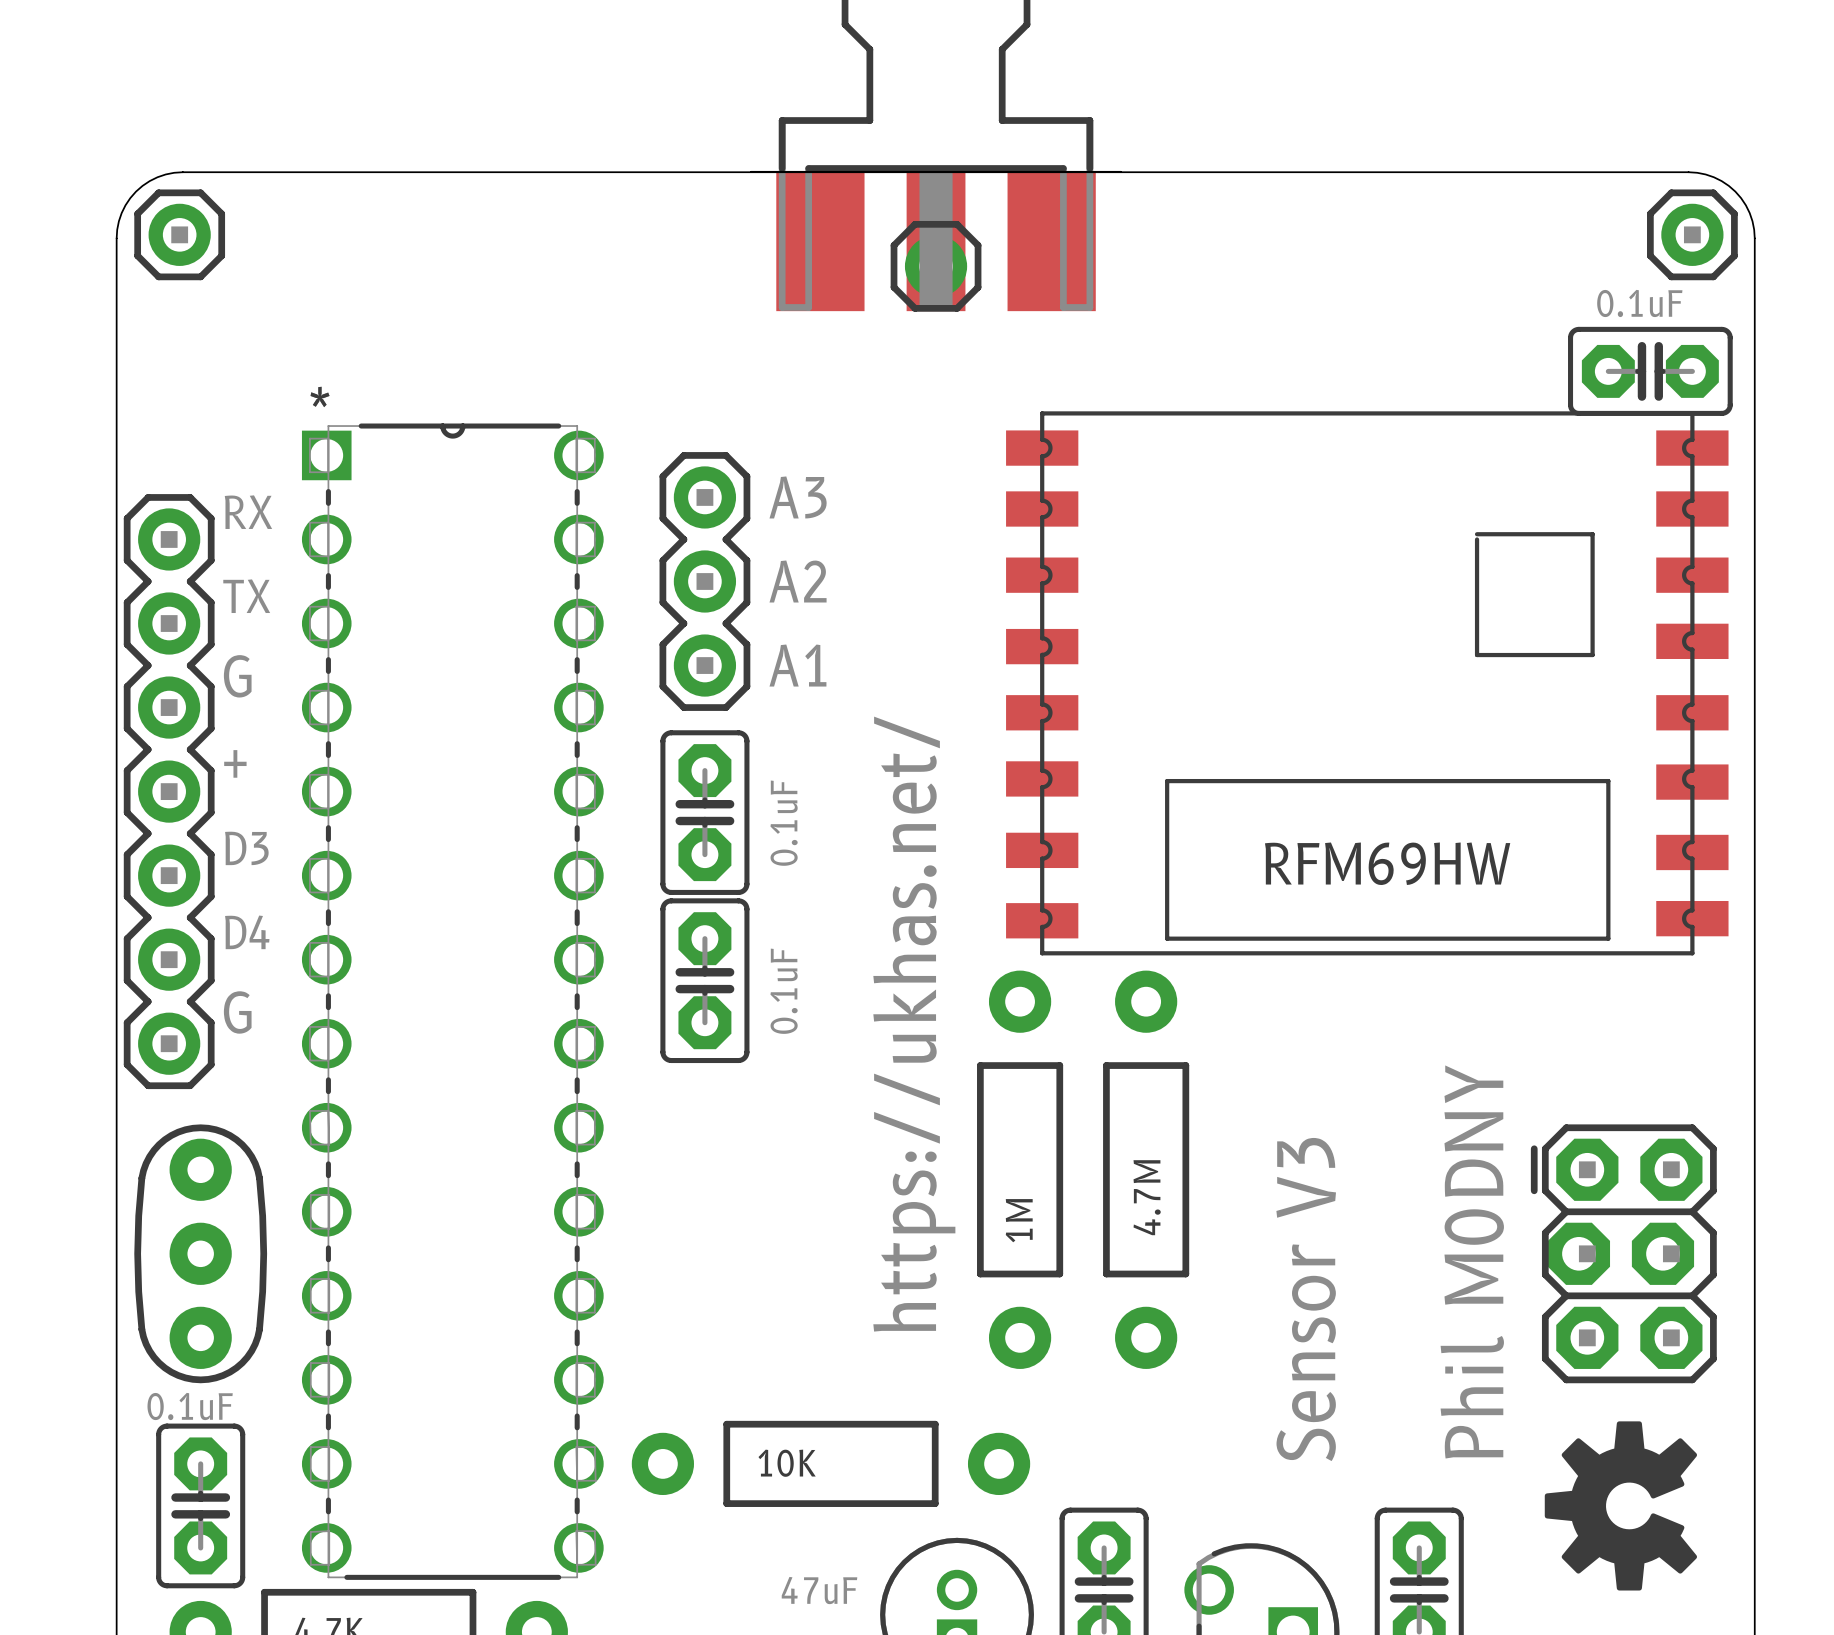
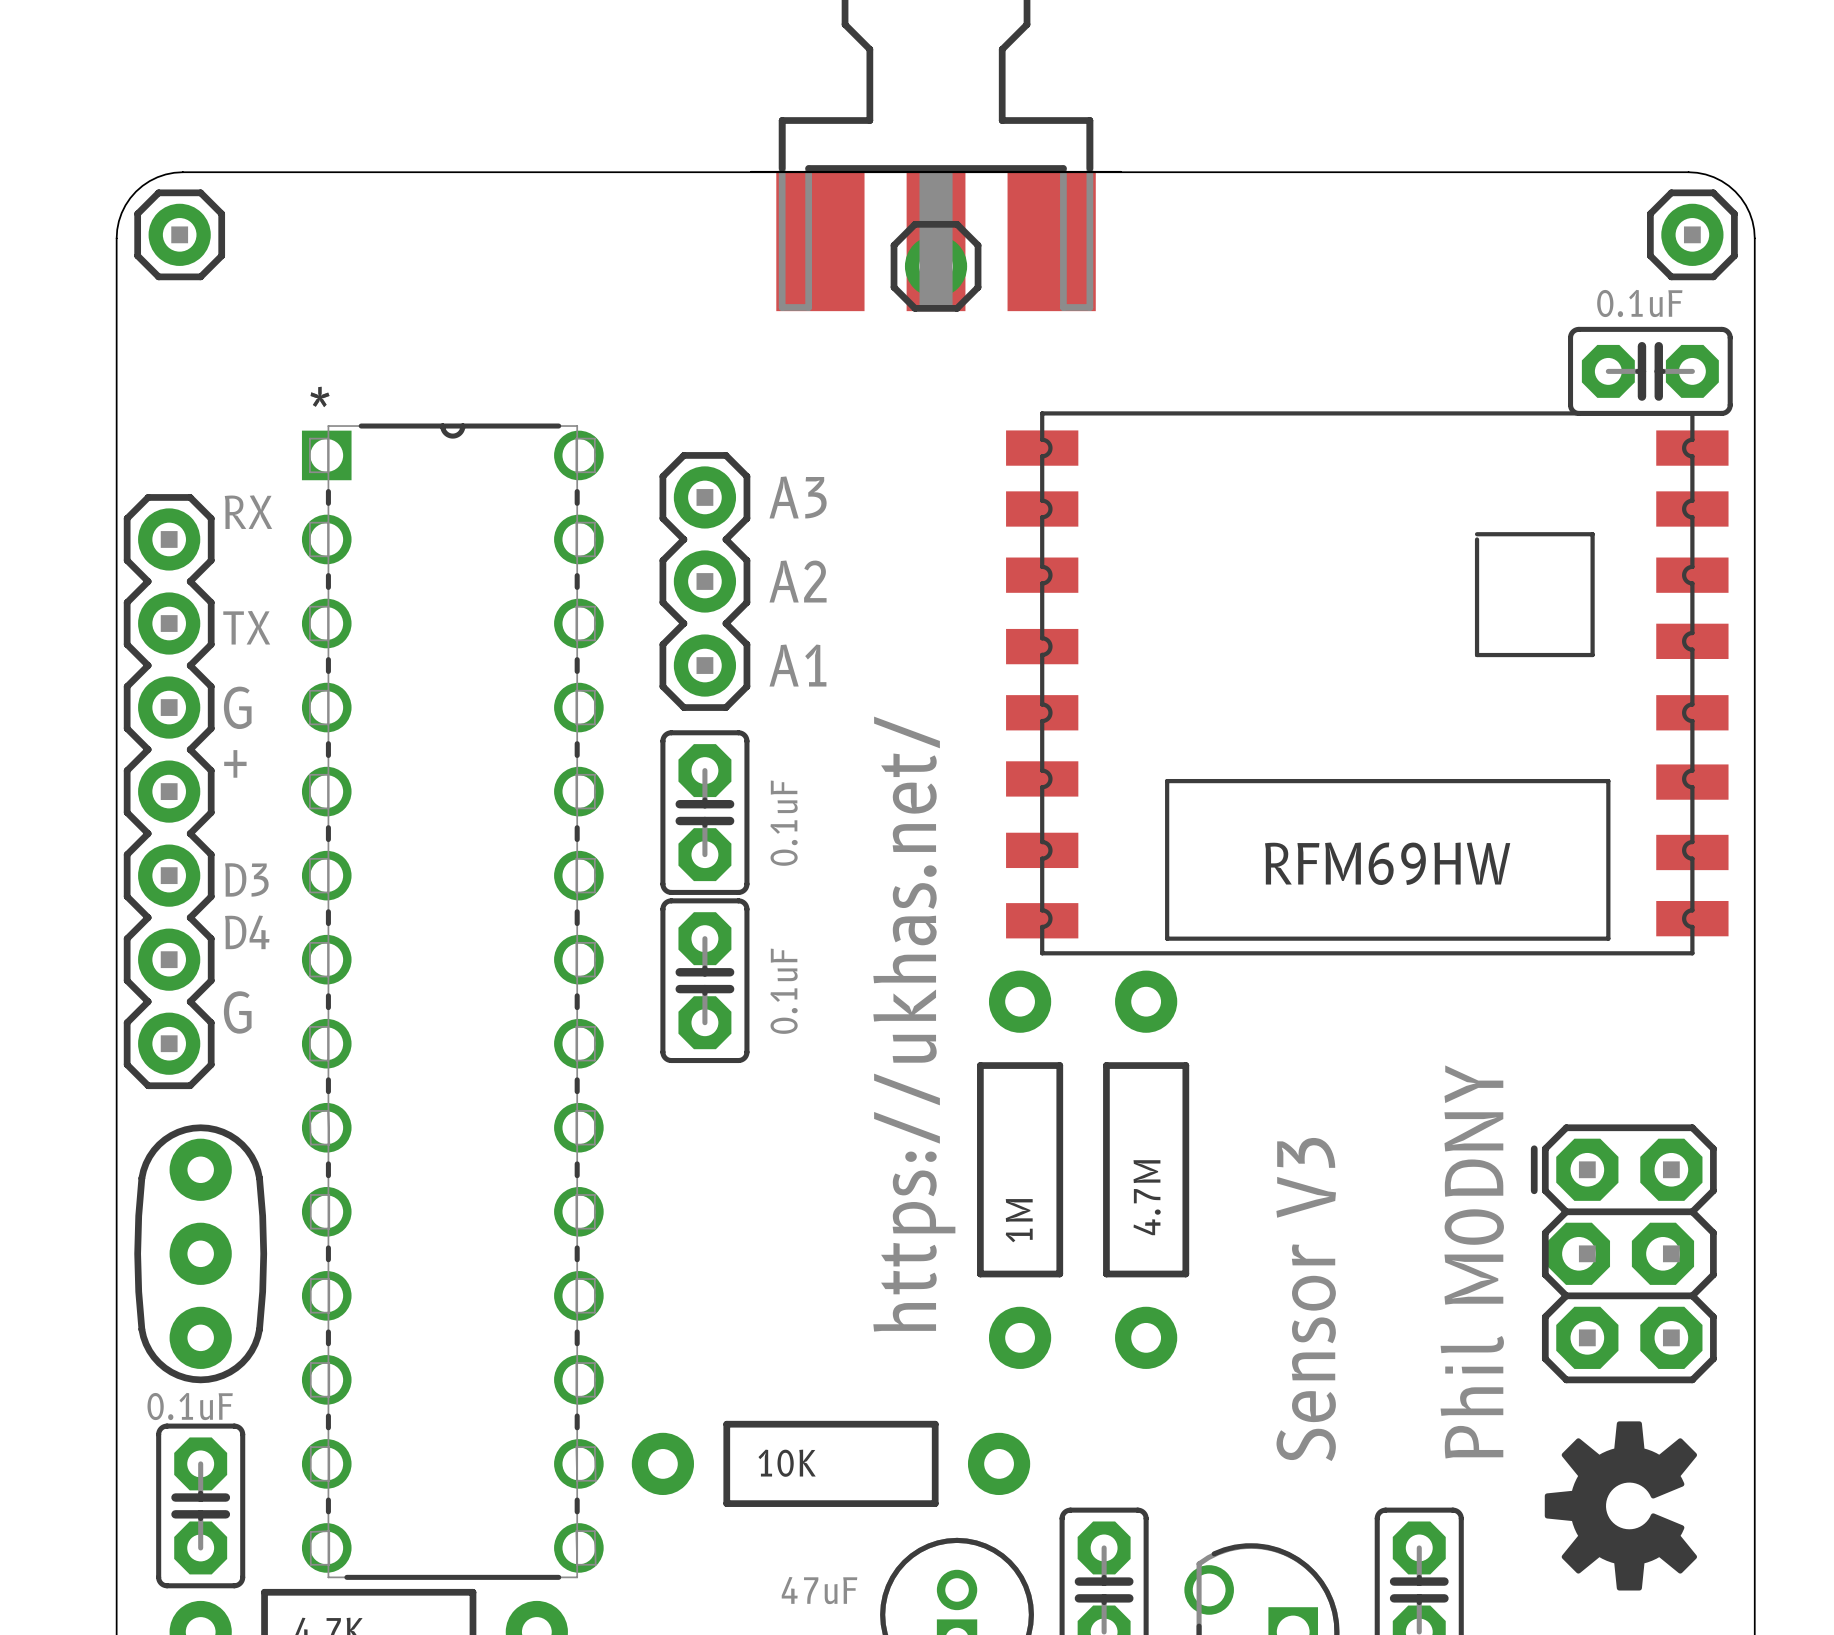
text position: TX (246, 596) -> TX (246, 627)
text position: G (237, 676) -> G (237, 707)
text position: D3 (246, 848) -> D3 (246, 879)

